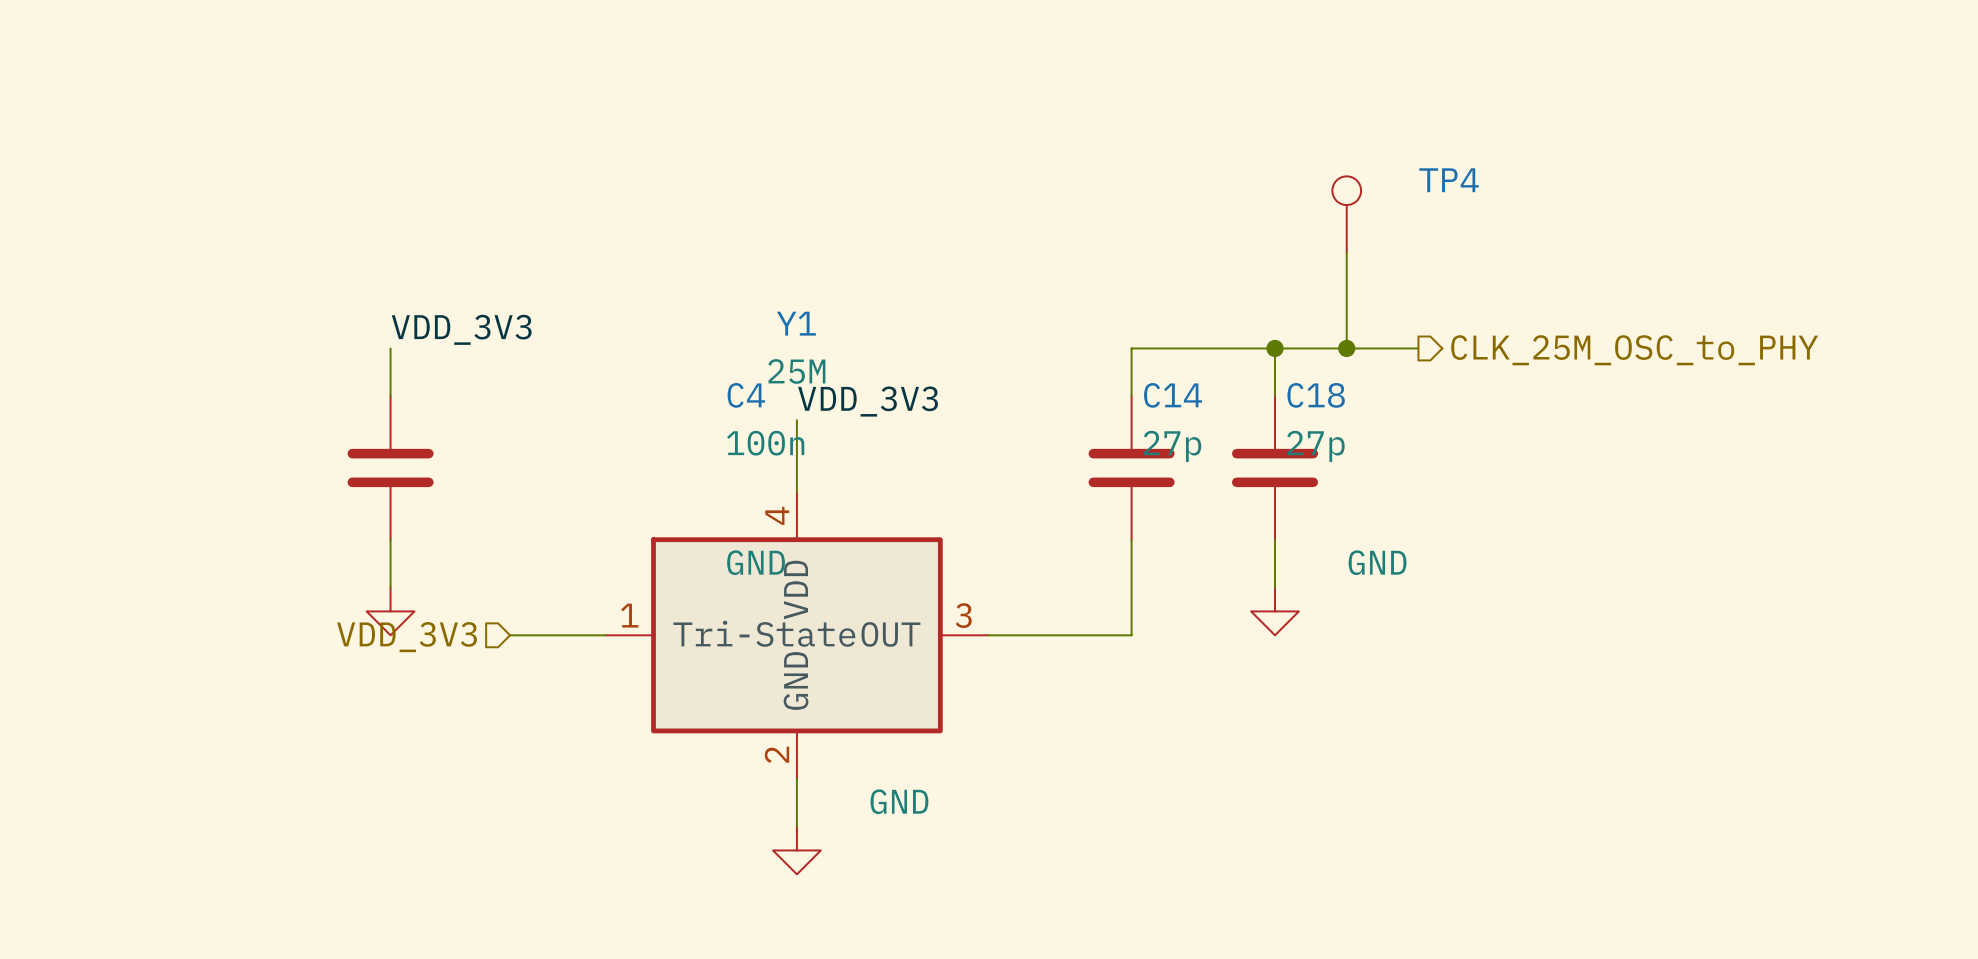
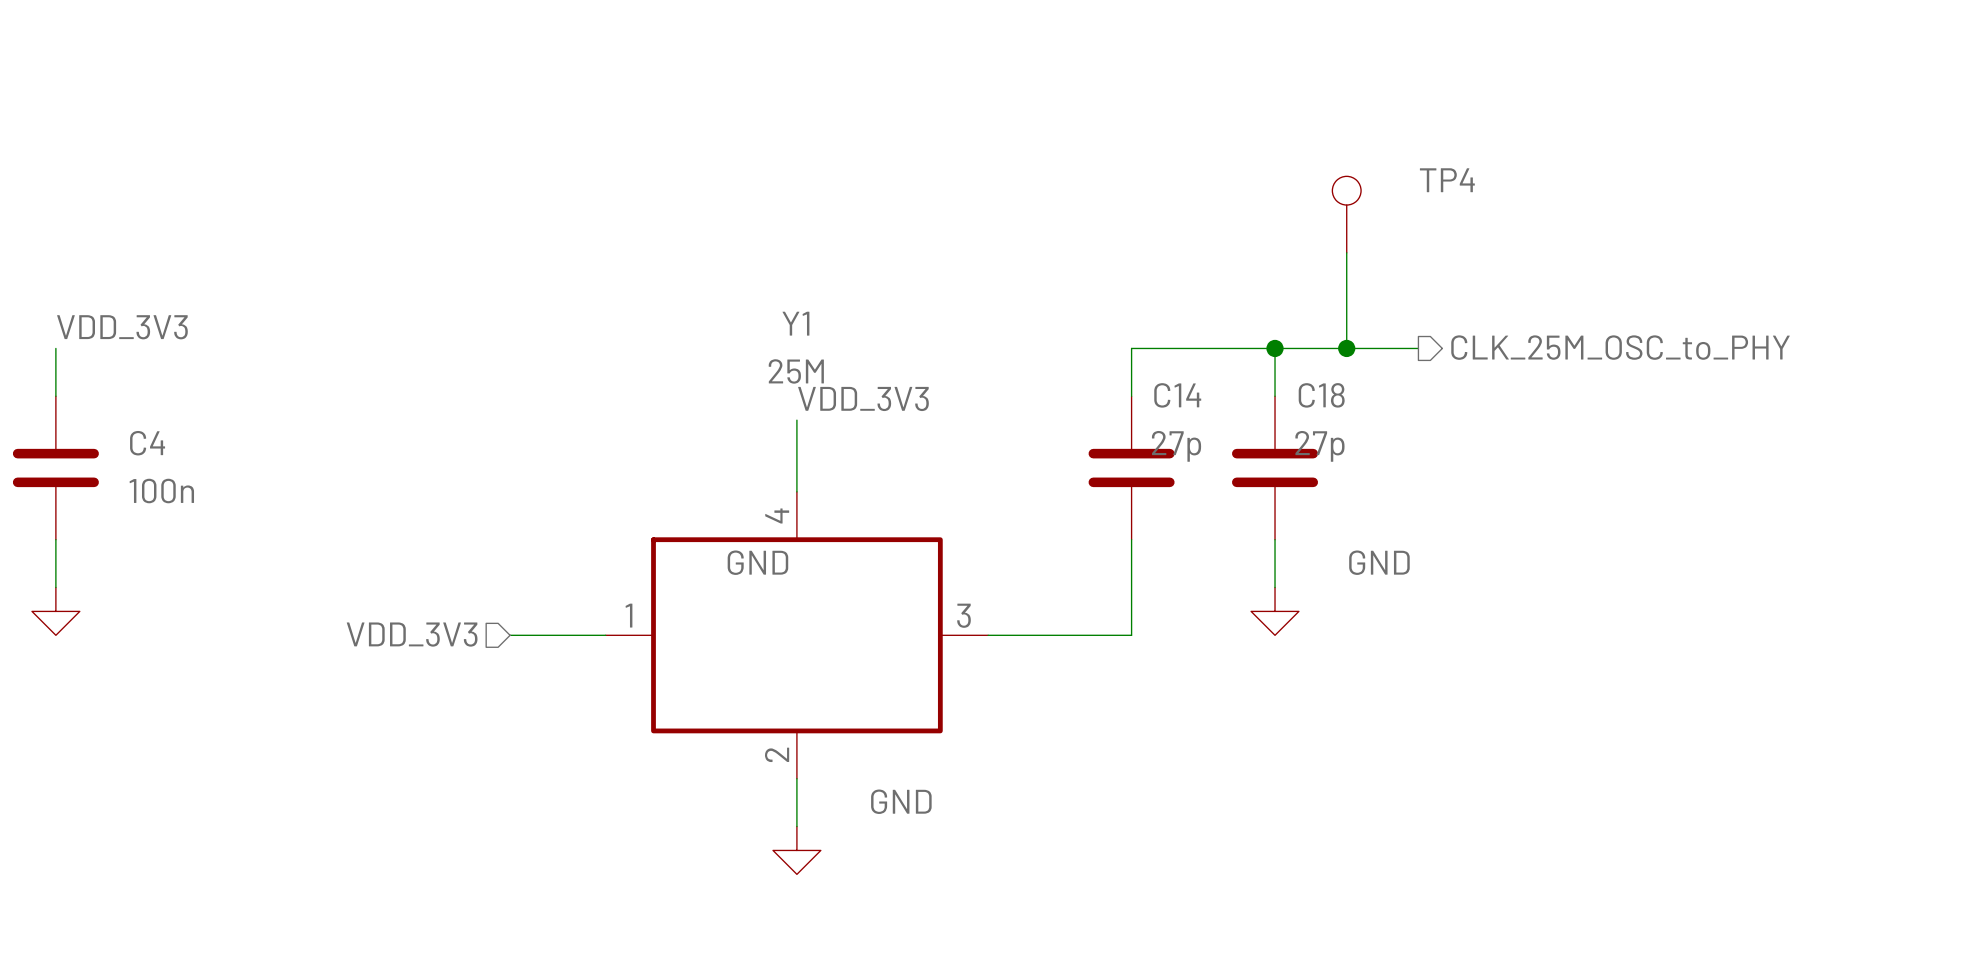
label position: VDD_3V3 (461, 329) -> VDD_3V3 (122, 327)
wire: (390, 348) (390, 396) -> (55, 348) (55, 396)
C4 name position: C4 (746, 395) -> C4 (147, 443)
C4 value position: 100n (765, 443) -> 100n (161, 491)
C4 position: (390, 467) -> (55, 467)
wire: (390, 539) (390, 587) -> (55, 539) (55, 587)
Y1 pin name: VDD (796, 589) -> none
power symbol position: GND (390, 611) -> GND (55, 611)
Y1 pin name: Tri-State (764, 633) -> none
Y1 pin name: OUT (890, 634) -> none
Y1 pin name: GND (796, 680) -> none

